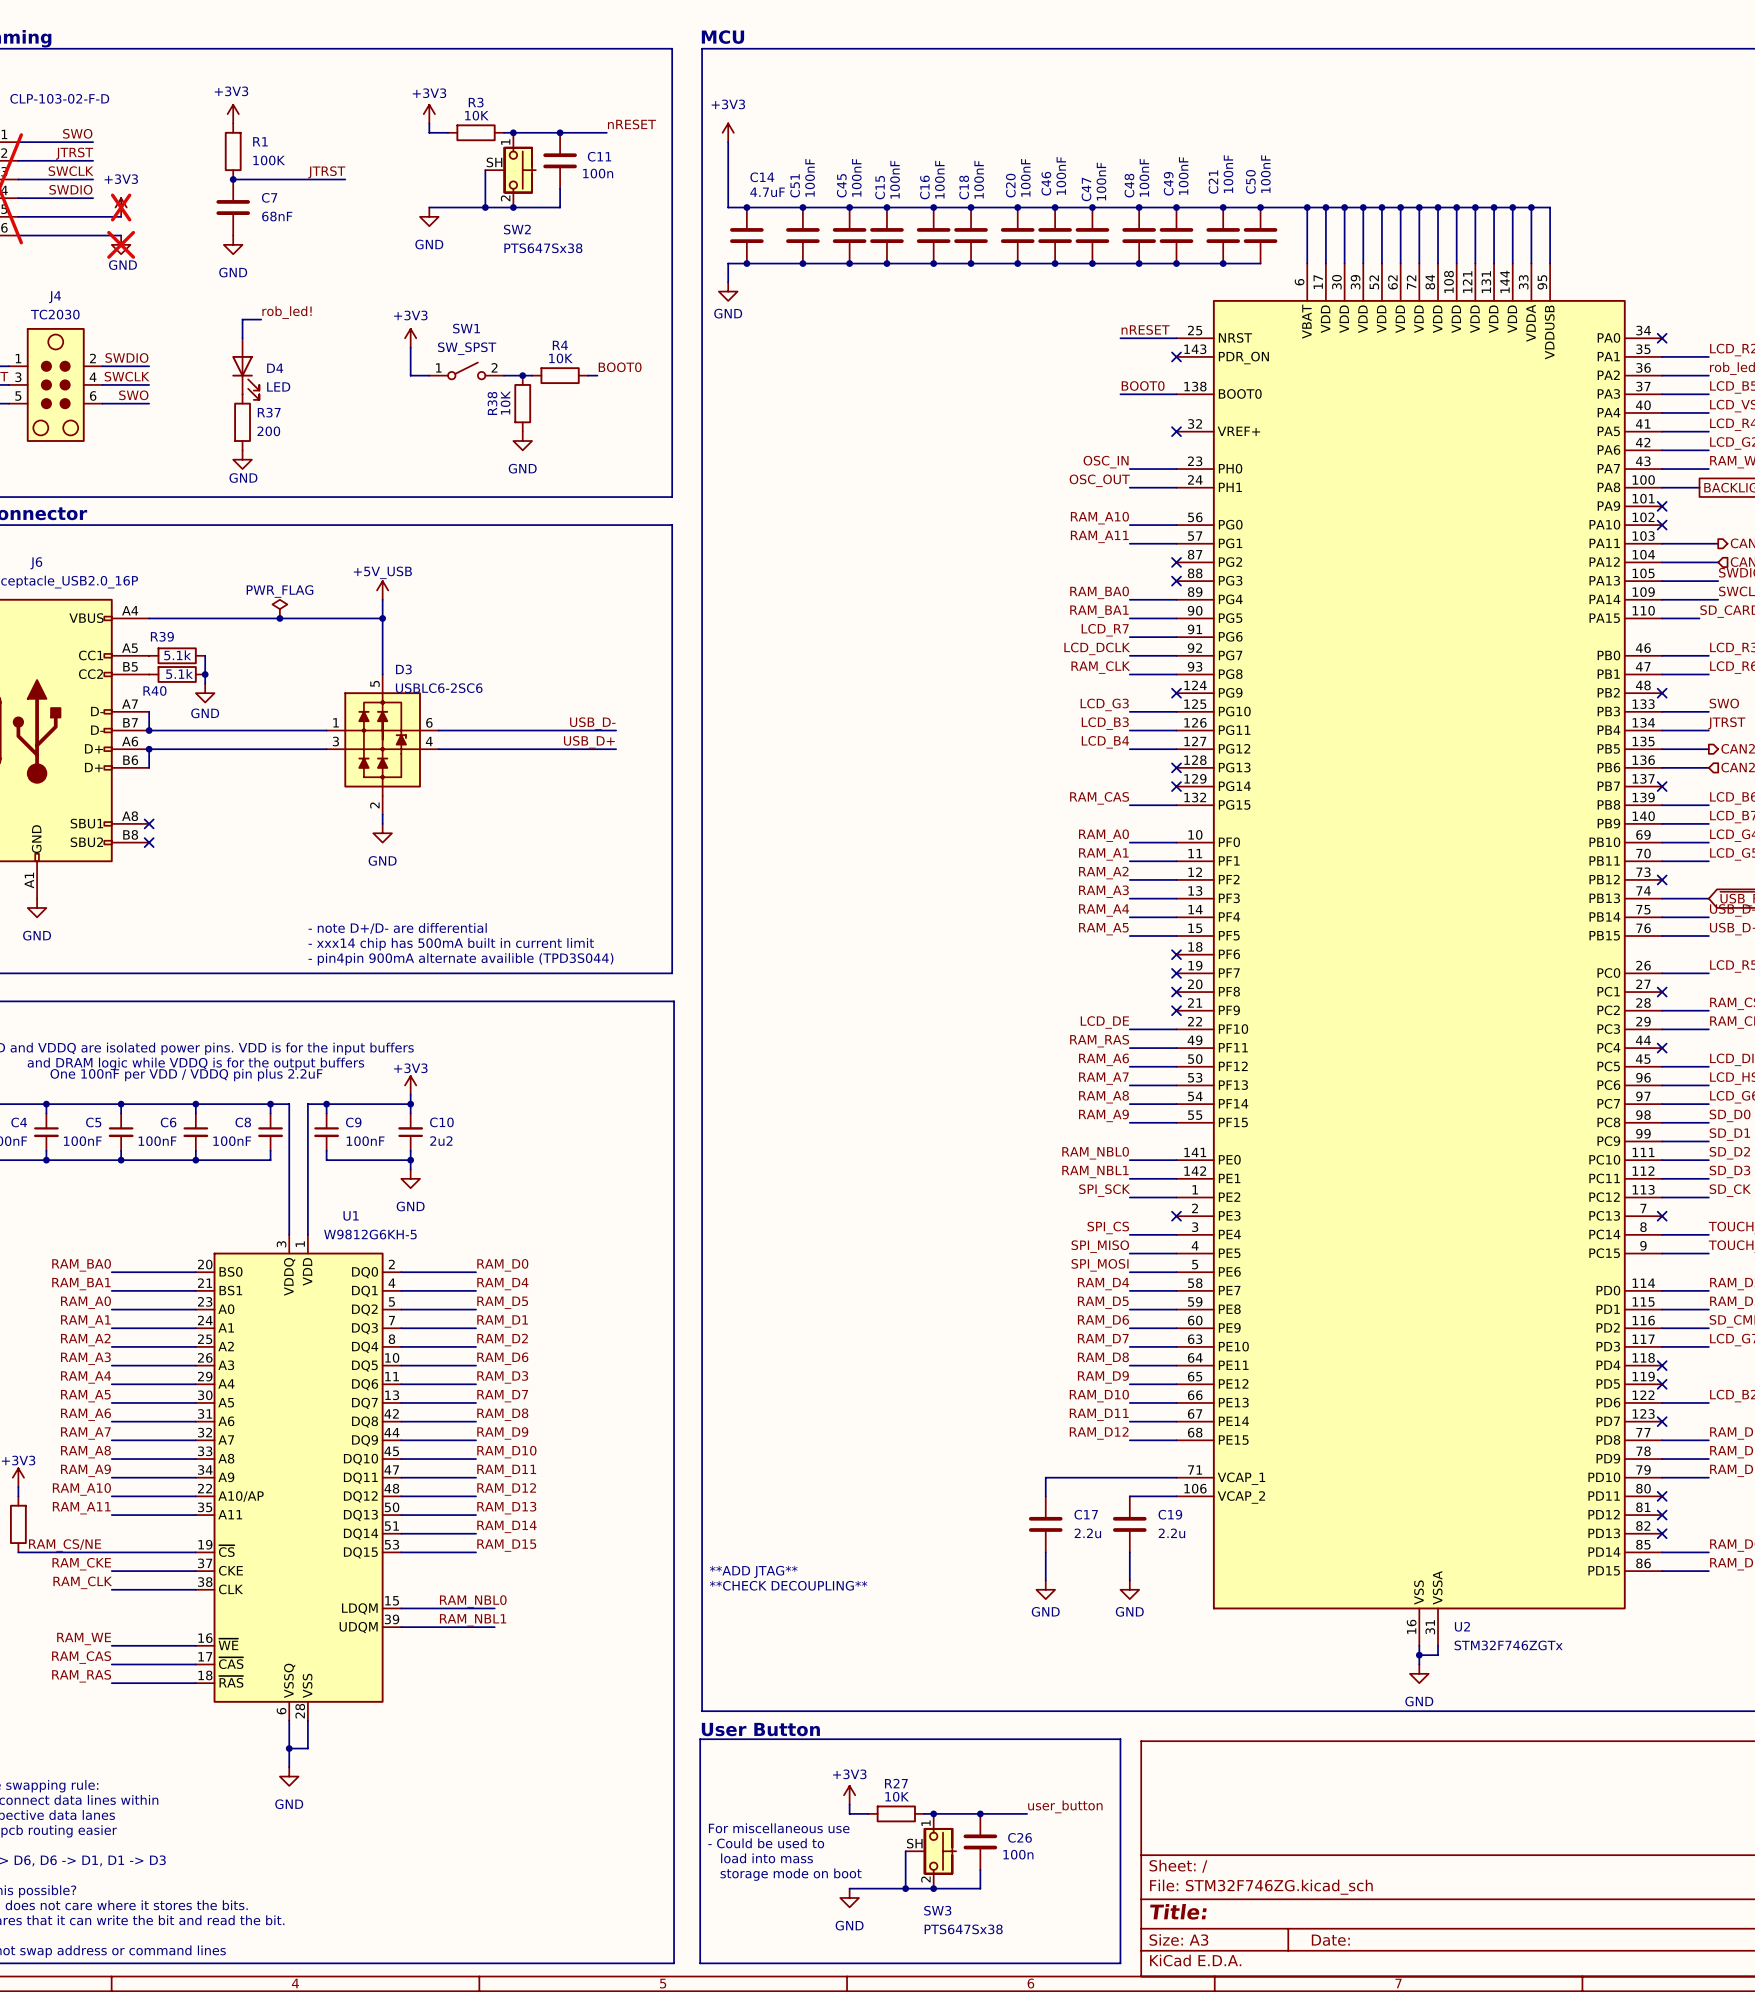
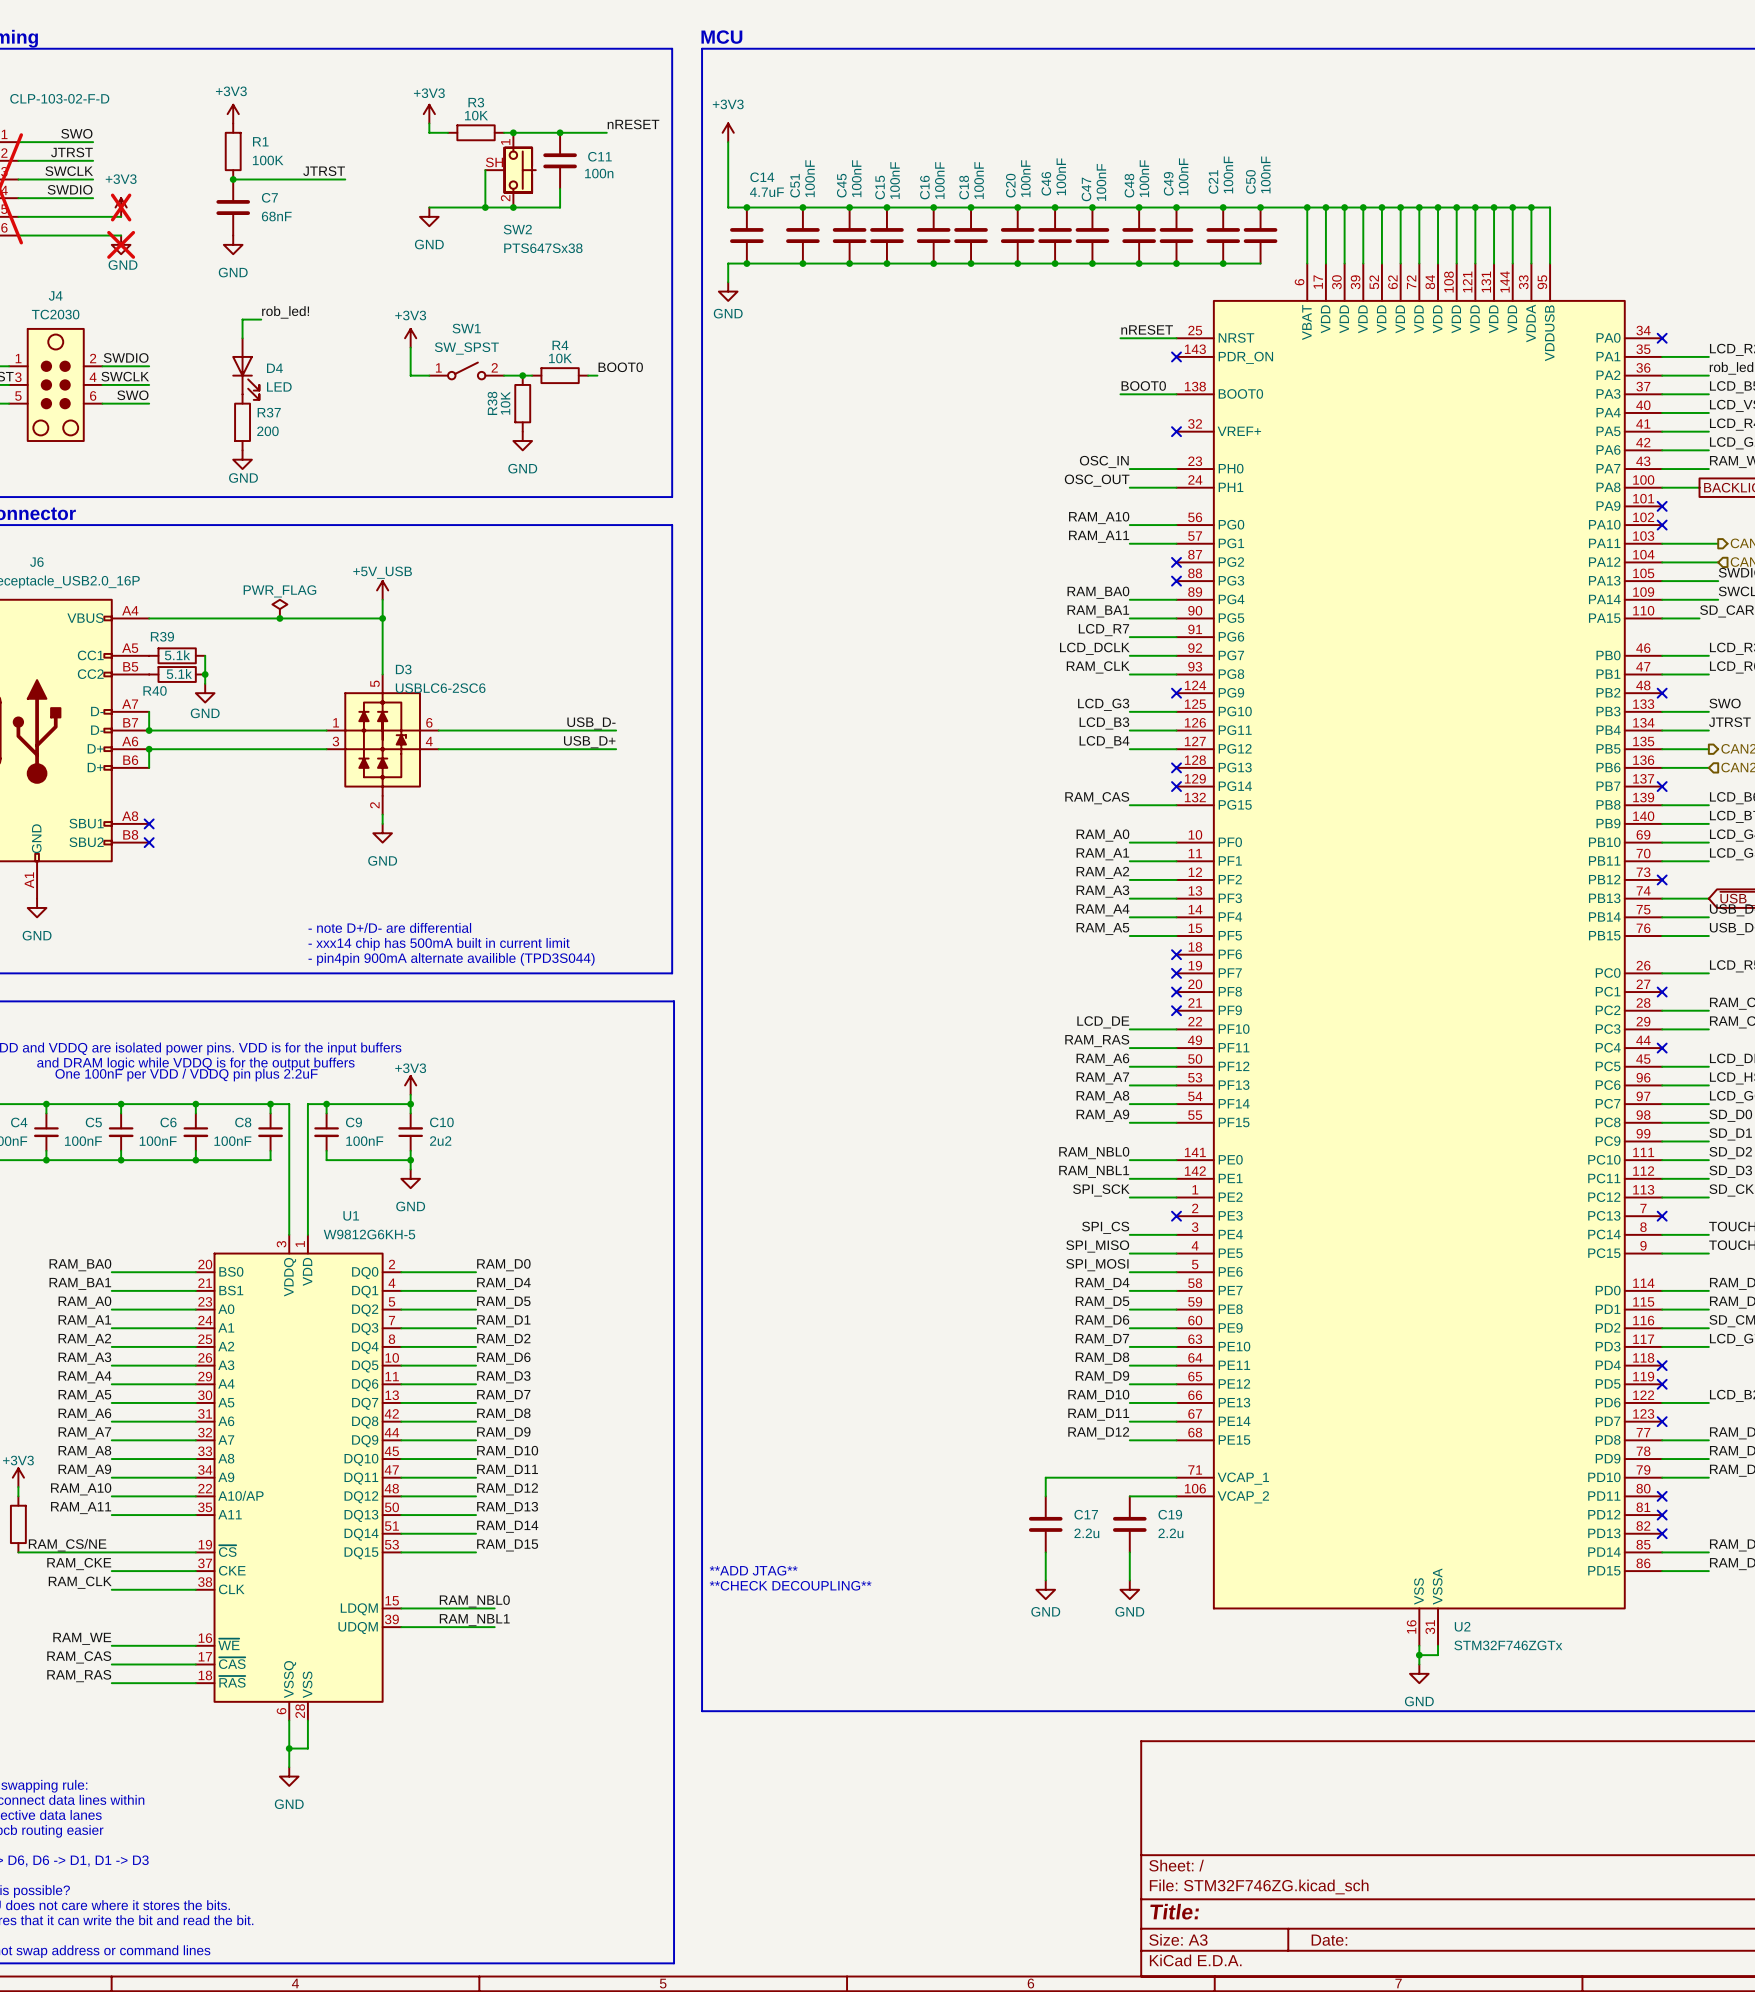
text: User Button (760, 1729) -> none
line: (700, 1739) (1120, 1739) (1120, 1963) (700, 1963) (700, 1739) -> none
power symbol: +3V3 (849, 1795) -> none
wire: (849, 1804) (849, 1813) (868, 1813) -> none
label: user_button (1065, 1806) -> none
R27: 10K (896, 1813) -> none
wire: (924, 1813) (1027, 1813) -> none
junction: (933, 1813) -> none
junction: (980, 1813) -> none
text: For miscellaneous use (779, 1828) -> none
C26: 100n (980, 1841) -> none
text: - Could be used to (766, 1843) -> none
wire: (905, 1851) (905, 1888) -> none
SW3: PTS647Sx38 (930, 1851) -> none
text: load into mass (767, 1858) -> none
wire: (980, 1869) (980, 1888) (849, 1888) -> none
text: storage mode on boot (791, 1874) -> none
junction: (905, 1888) -> none
junction: (933, 1888) -> none
power symbol: GND (849, 1897) -> none

